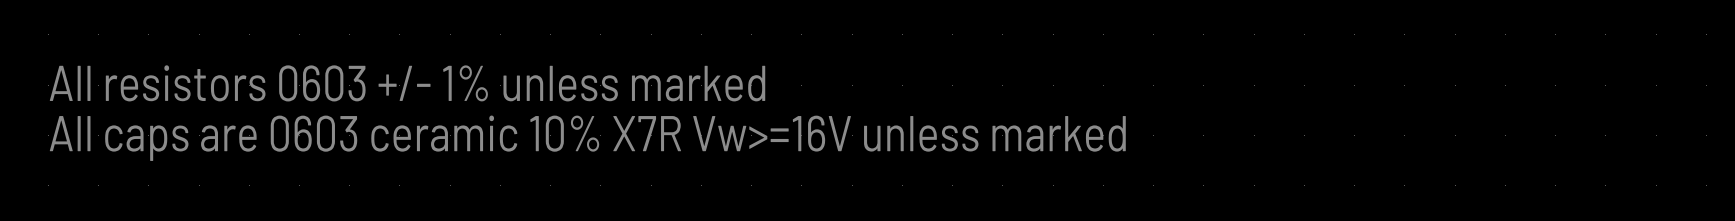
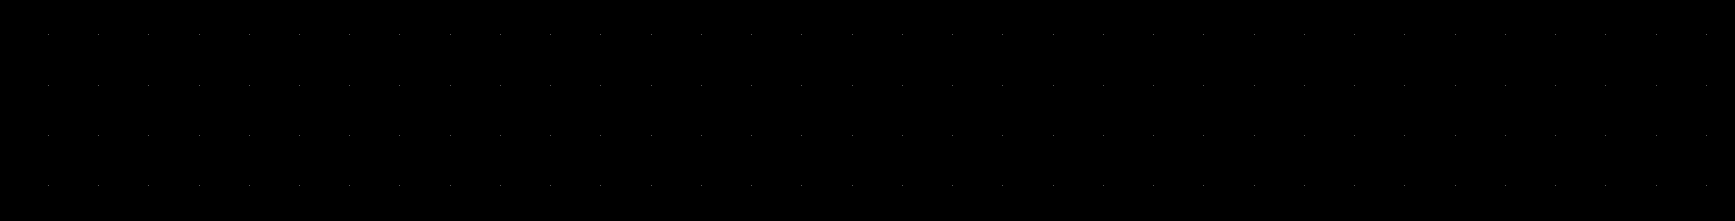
text: All resistors 0603 +/- 1% unless marked (407, 83) -> none
text: All caps are 0603 ceramic 10% X7R Vw>=16V unless marked (587, 138) -> none

